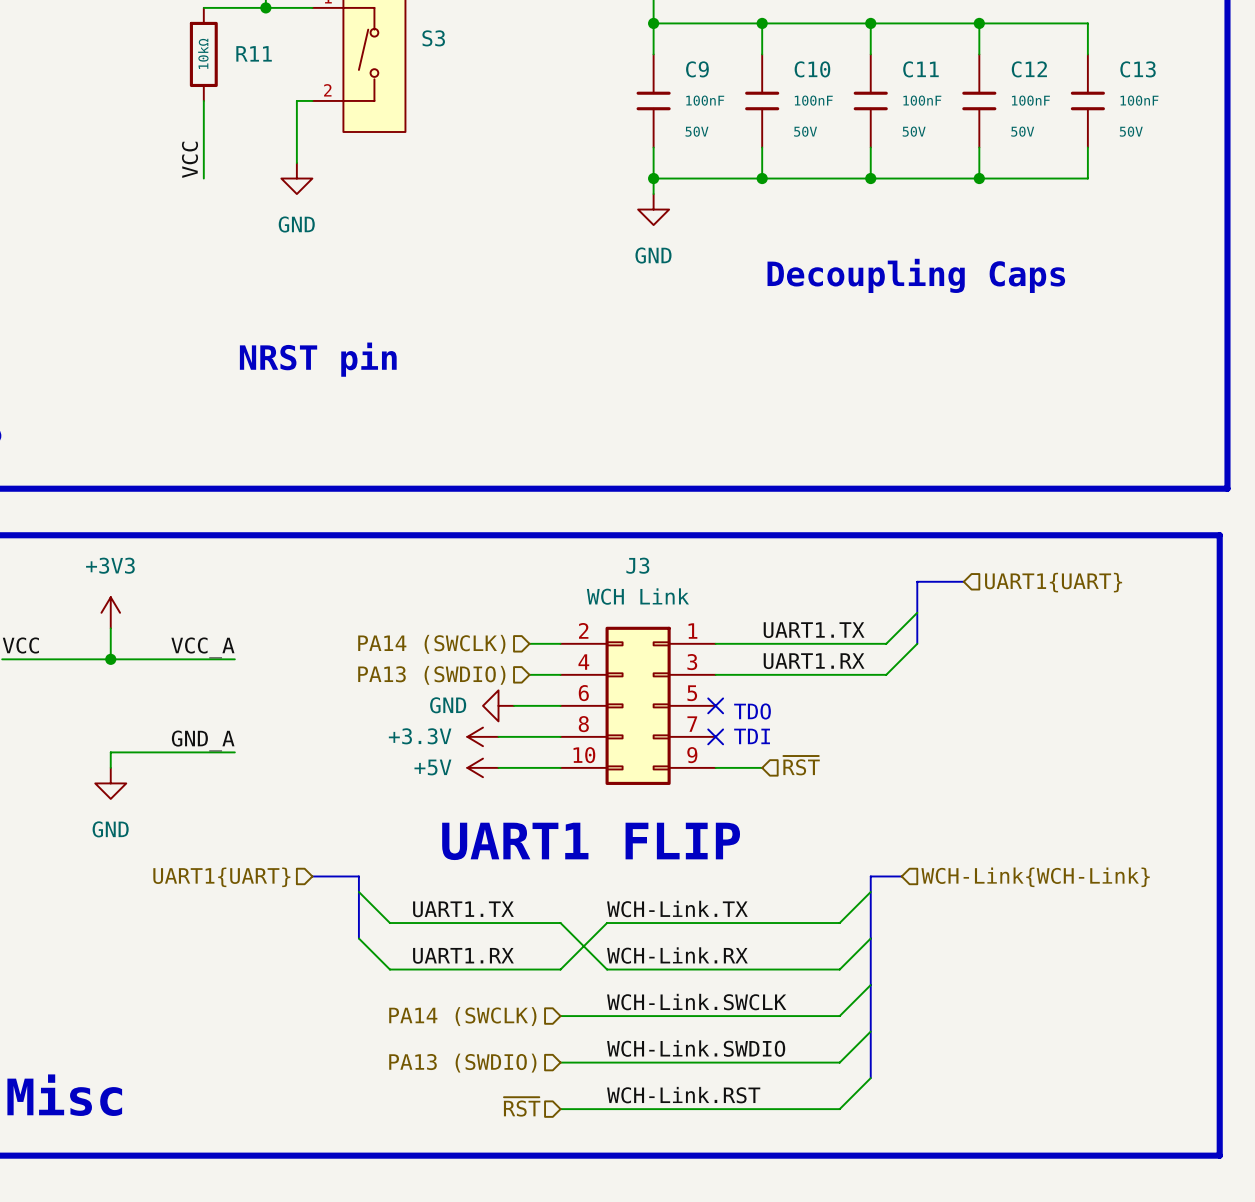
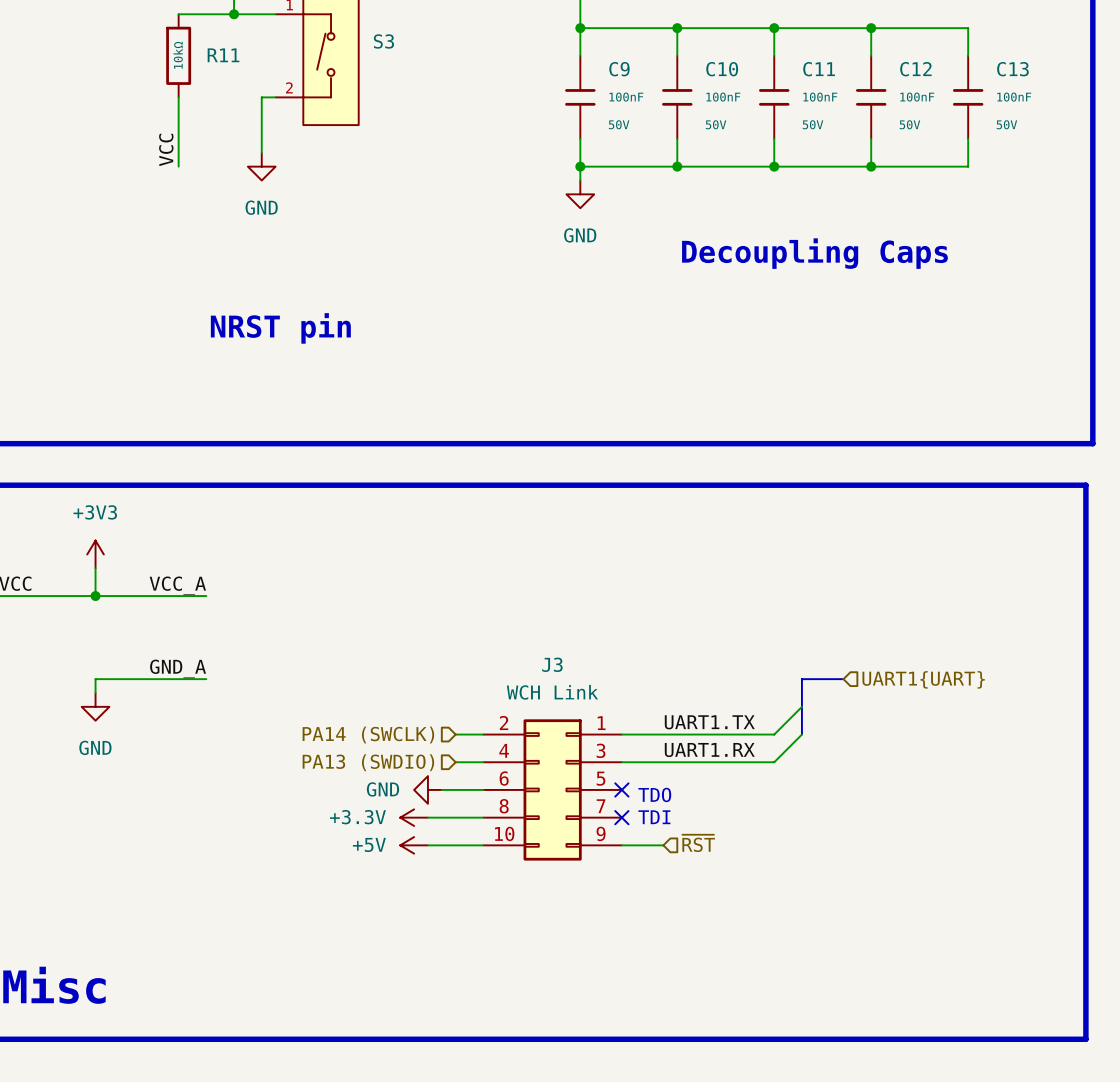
bus: (963, 581) (917, 581) (917, 643) -> (843, 679) (801, 679) (801, 734)
hierarchical label position: UART1{UART} (1053, 582) -> UART1{UART} (923, 679)
wire: (917, 612) (886, 643) (715, 643) -> (801, 706) (774, 734) (621, 734)
label: UART1.TX (814, 630) -> none
wire: (529, 643) (560, 643) -> (455, 734) (483, 734)
wire: (917, 643) (886, 674) (715, 674) -> (801, 734) (774, 762) (621, 762)
hierarchical label: PA14 (SWCLK) (431, 644) -> none
label: UART1.RX (814, 661) -> none
wire: (529, 674) (560, 674) -> (455, 762) (483, 762)
hierarchical label: PA13 (SWDIO) (431, 675) -> none
power symbol position: GND (498, 705) -> GND (427, 789)
wire: (514, 705) (560, 705) -> (441, 789) (483, 789)
J3 position: (638, 705) -> (552, 789)
no-connect mark: (715, 705) -> none
text position: TDO (752, 711) -> TDO (654, 794)
power symbol position: +3.3V (483, 736) -> +3.3V (414, 817)
wire: (498, 736) (560, 736) -> (427, 817) (483, 817)
no-connect mark: (715, 736) -> none
text position: TDI (752, 736) -> TDI (654, 817)
hierarchical label: ~{RST} (801, 765) -> none
power symbol position: +5V (483, 767) -> +5V (414, 845)
wire: (498, 767) (560, 767) -> (427, 845) (483, 845)
wire: (715, 767) (762, 767) -> (621, 845) (663, 845)
label: none -> UART1.TX (709, 722)
hierarchical label: none -> PA14 (SWCLK) (368, 735)
label: none -> UART1.RX (709, 750)
text: UART1 FLIP (591, 841) -> none
hierarchical label: none -> PA13 (SWDIO) (368, 762)
bus: (312, 876) (358, 876) (358, 938) -> none
no-connect mark: none -> (621, 789)
bus: (901, 876) (870, 876) (870, 1078) -> none
hierarchical label: UART1{UART} (221, 877) -> none
hierarchical label: WCH-Link{WCH-Link} (1035, 877) -> none
wire: (358, 891) (389, 923) (560, 923) (607, 969) (839, 969) (870, 938) -> none
wire: (870, 891) (839, 923) (607, 923) (560, 969) (389, 969) (358, 938) -> none
no-connect mark: none -> (621, 817)
label: WCH-Link.TX (677, 908) -> none
label: UART1.TX (463, 909) -> none
hierarchical label: none -> ~{RST} (698, 843)
label: UART1.RX (463, 955) -> none
label: WCH-Link.RX (677, 955) -> none
wire: (870, 985) (839, 1016) (560, 1016) -> none
label: WCH-Link.SWCLK (696, 1002) -> none
hierarchical label: PA14 (SWCLK) (462, 1016) -> none
wire: (870, 1031) (839, 1062) (560, 1062) -> none
label: WCH-Link.SWDIO (696, 1048) -> none
hierarchical label: PA13 (SWDIO) (462, 1063) -> none
wire: (870, 1078) (839, 1109) (560, 1109) -> none
label: WCH-Link.RST (683, 1095) -> none
hierarchical label: ~{RST} (522, 1106) -> none

